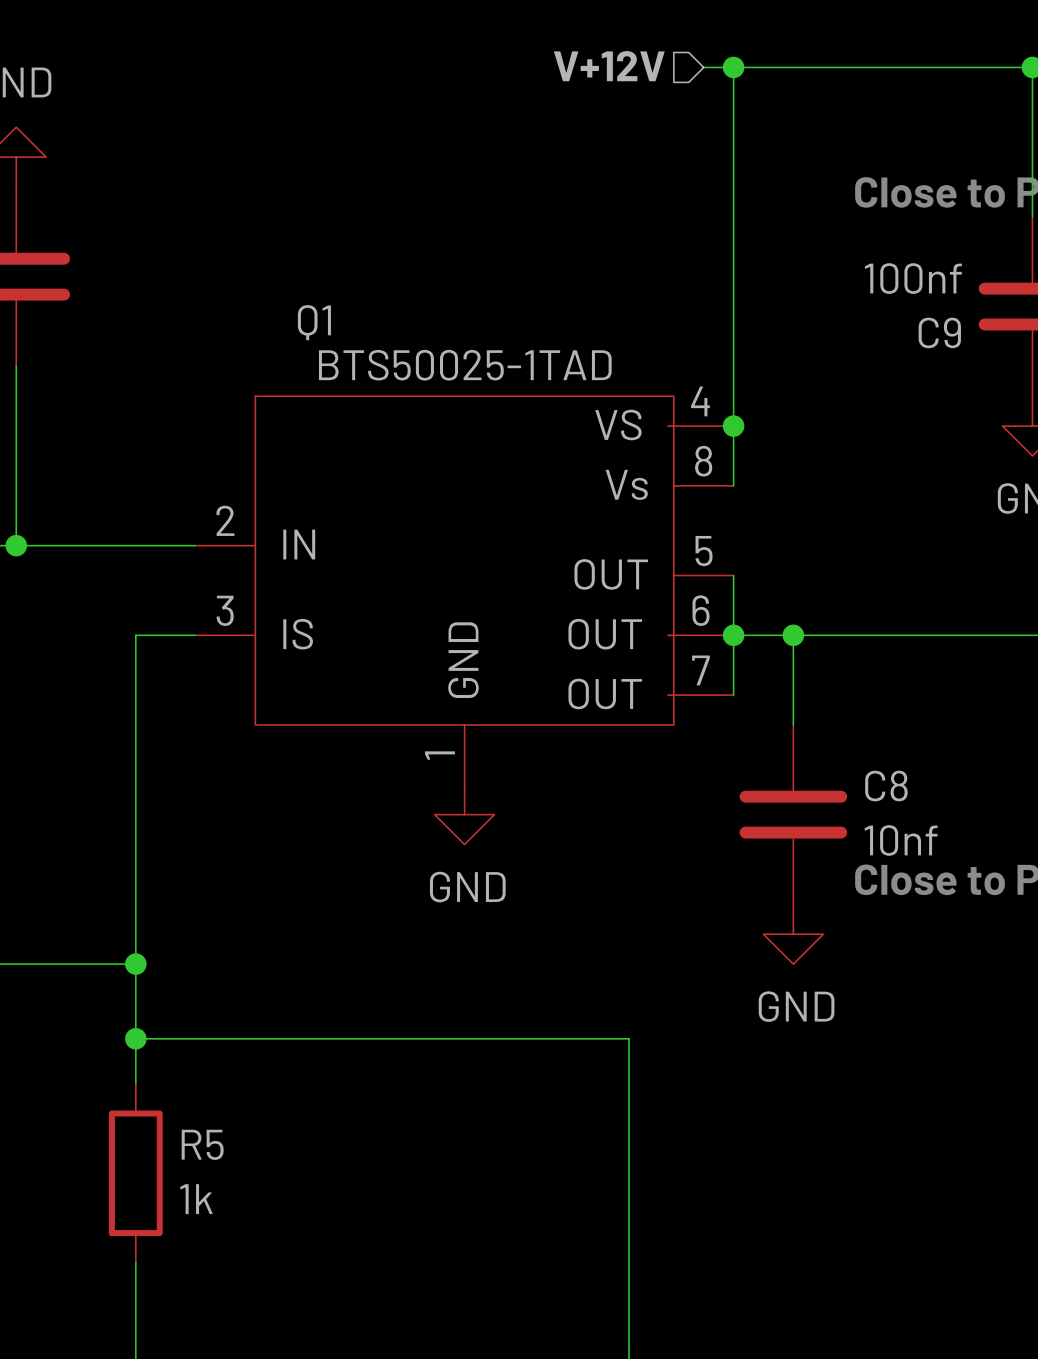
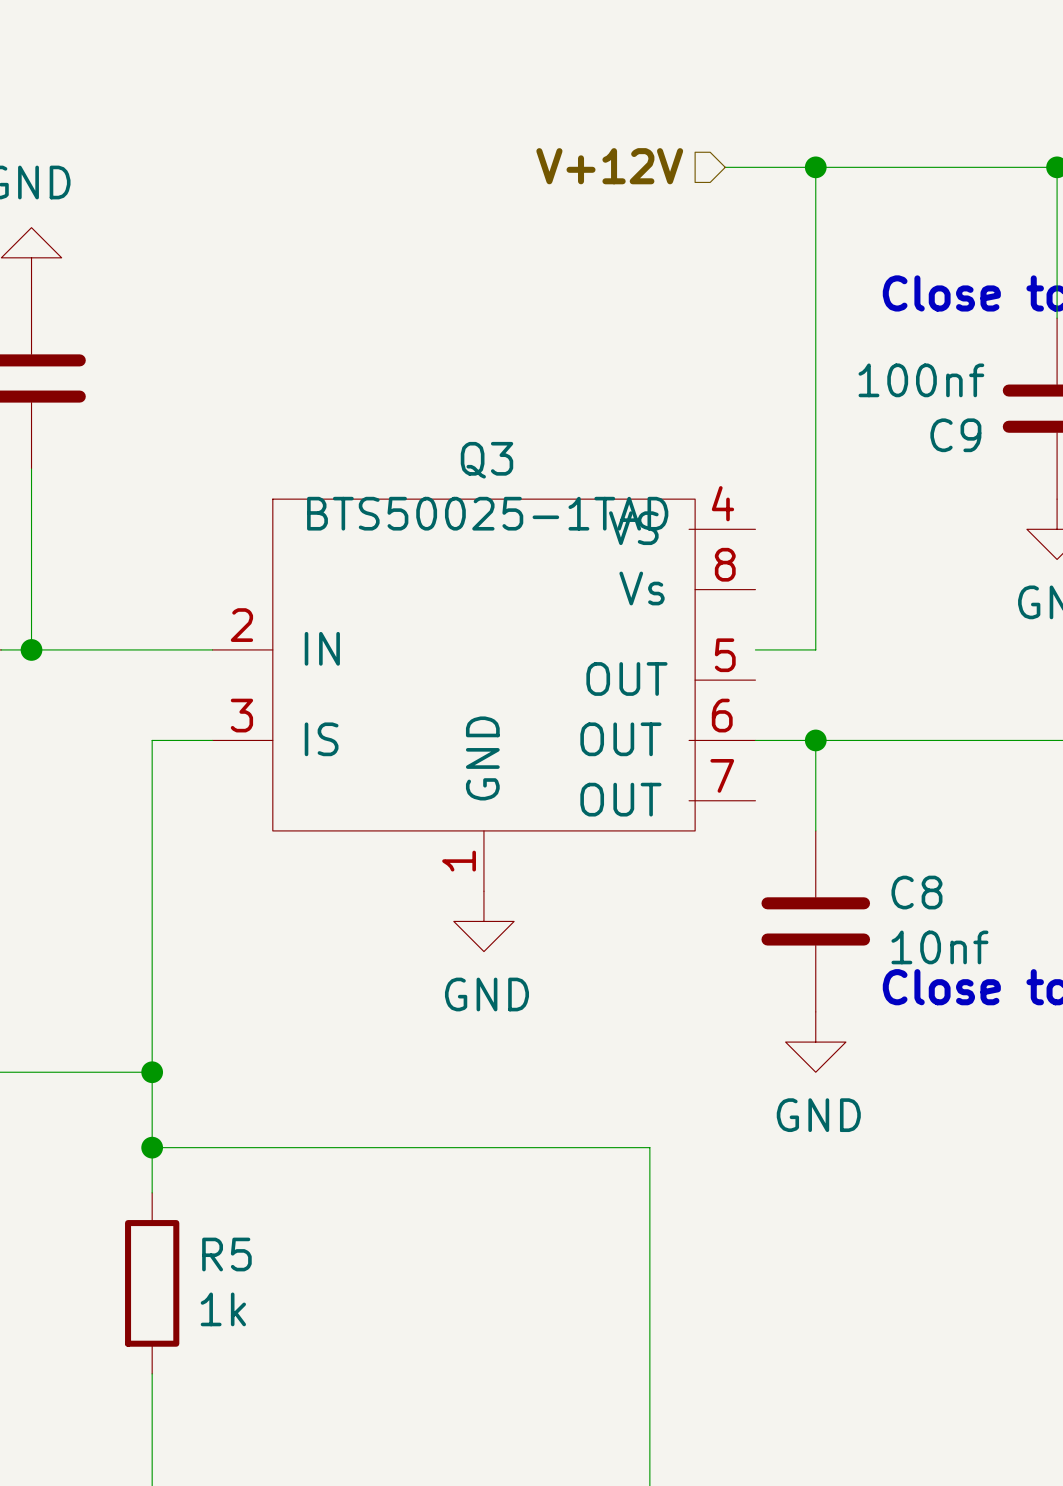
wire: (733, 67) (733, 485) -> none
junction position: (733, 67) -> (815, 167)
wire: none -> (815, 167) (815, 649) (755, 649)
Q1 name: Q1 (314, 322) -> Q3 (486, 460)
Q1 value position: BTS50025-1TAD (465, 365) -> BTS50025-1TAD (487, 513)
junction: (733, 426) -> none
wire: (733, 575) (733, 695) -> none
junction: (733, 635) -> none

